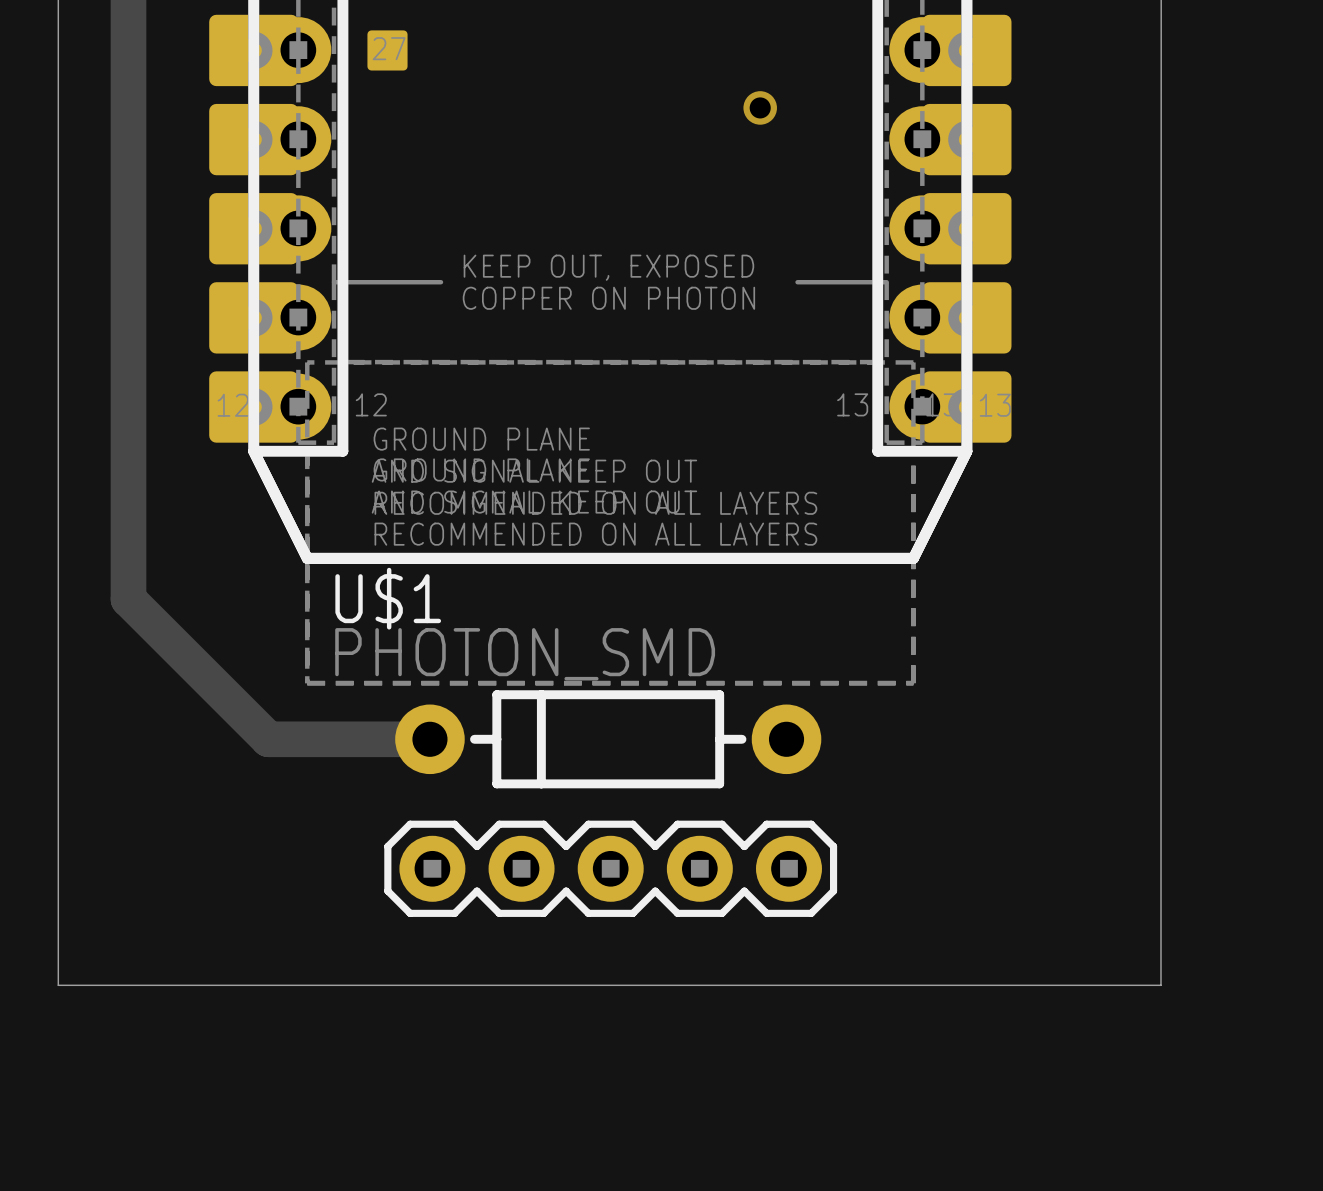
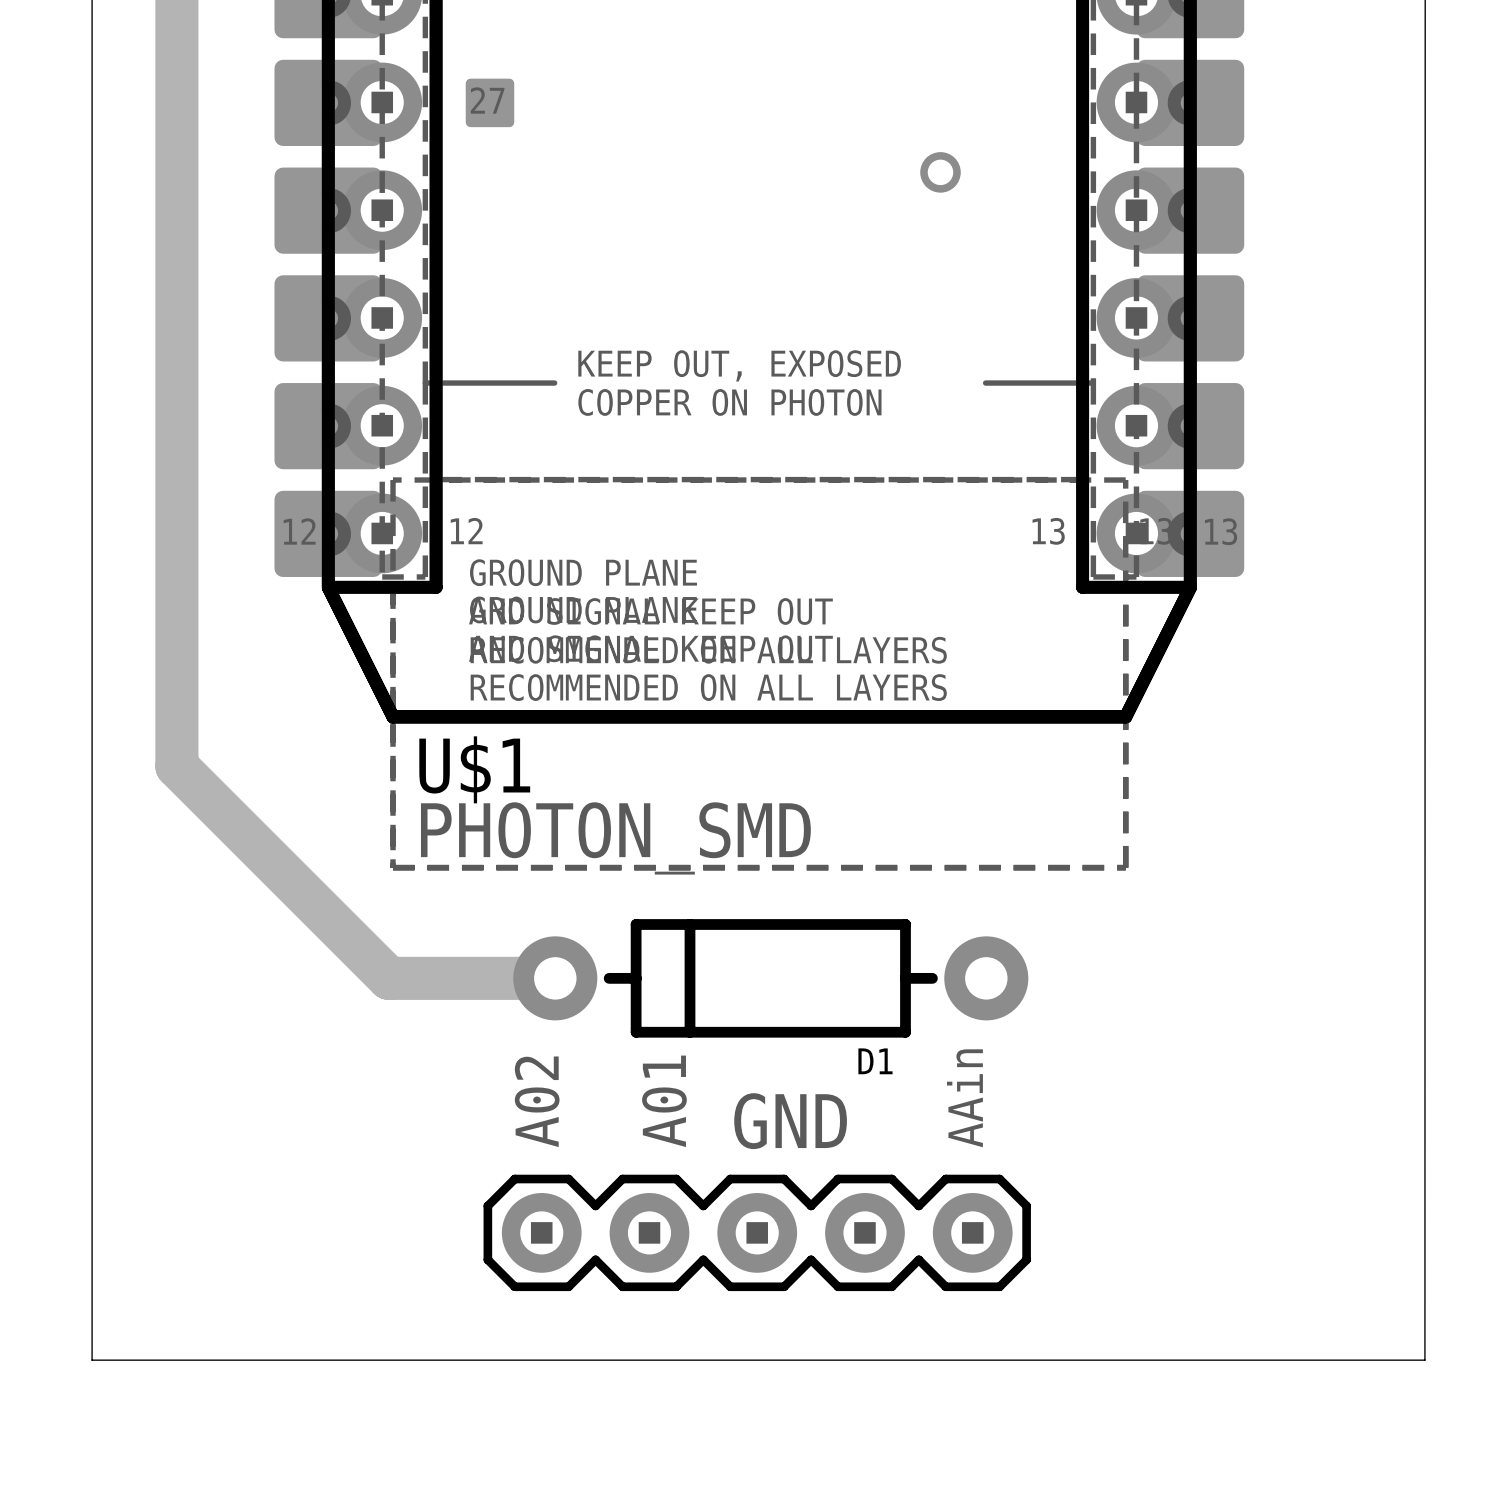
track: (268, 739) (429, 739) -> (346, 935) (389, 978) (555, 978)
part: (608, 739) -> none
D1: none -> (770, 978)
part position: (610, 868) -> (757, 1232)
text: none -> A02 (537, 1101)
text: none -> A01 (664, 1101)
text: none -> AAin (964, 1098)
text: none -> GND (790, 1121)
board edge: (58, 985) (1160, 985) -> (92, 1232) (92, 1360) (1424, 1360) (1424, 1232)

